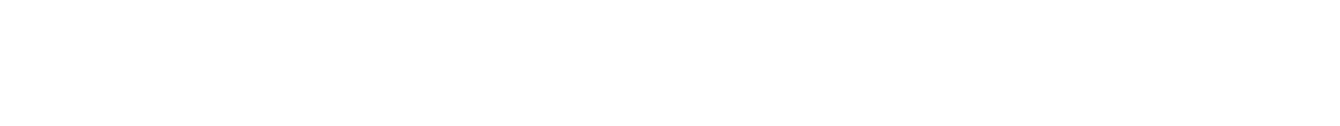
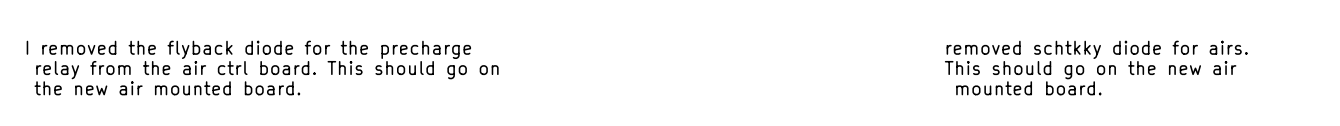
text: none -> I removed the flyback diode for the precharge (248, 49)
text: none -> removed schtkky diode for airs. (1097, 49)
text: none -> relay from the air ctrl board. This should go on (267, 70)
text: none -> This should go on the new air (1090, 70)
text: none -> the new air mounted board. (167, 88)
text: none -> mounted board. (1028, 88)

